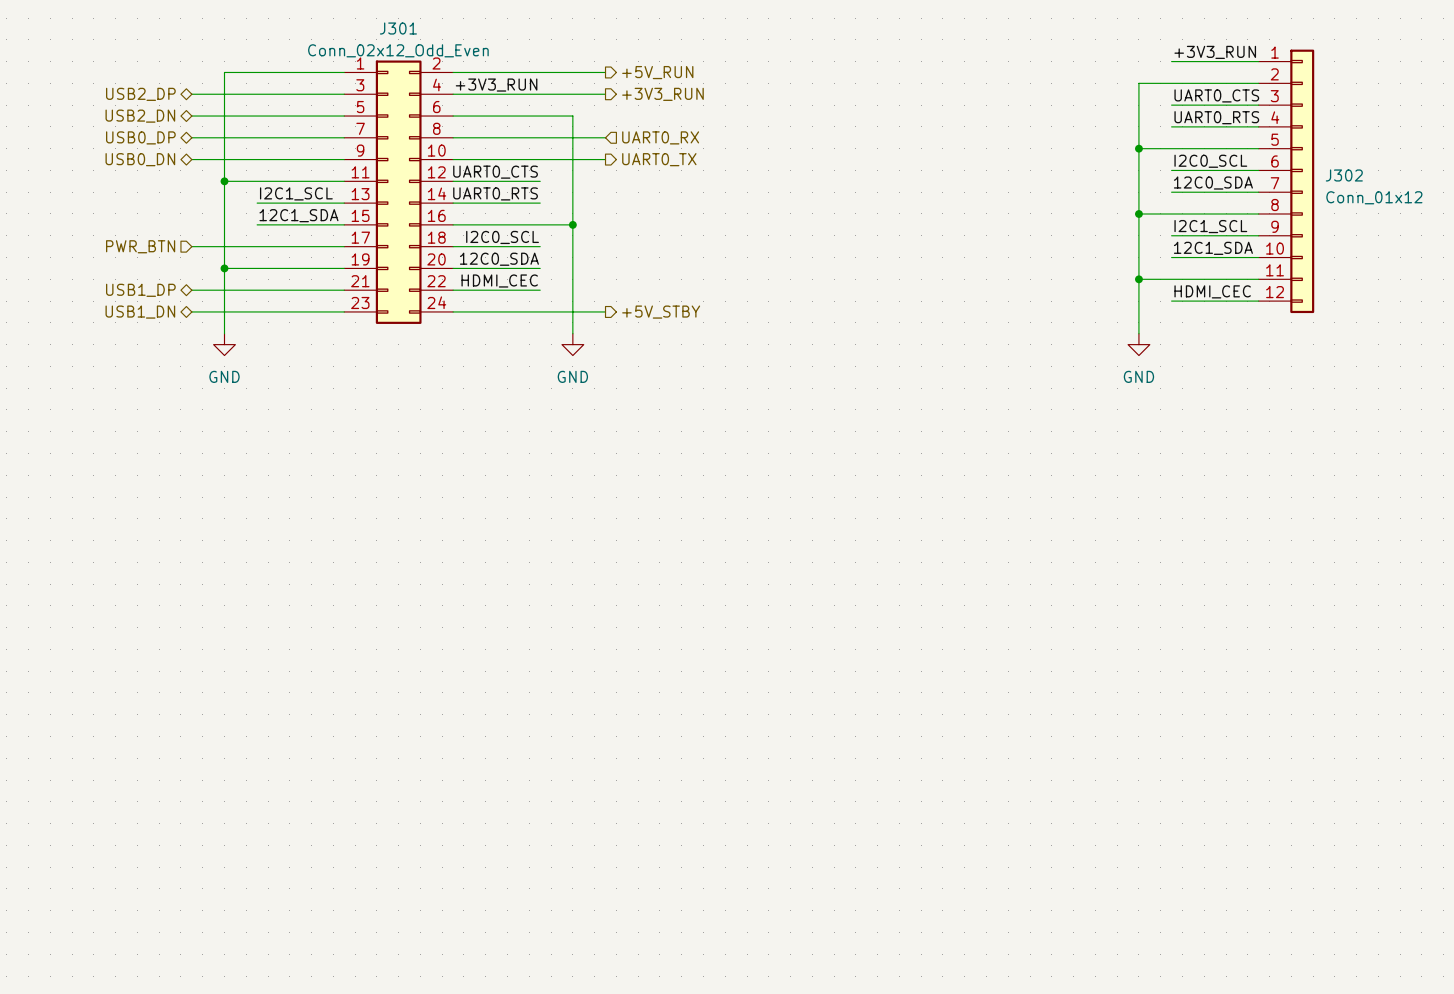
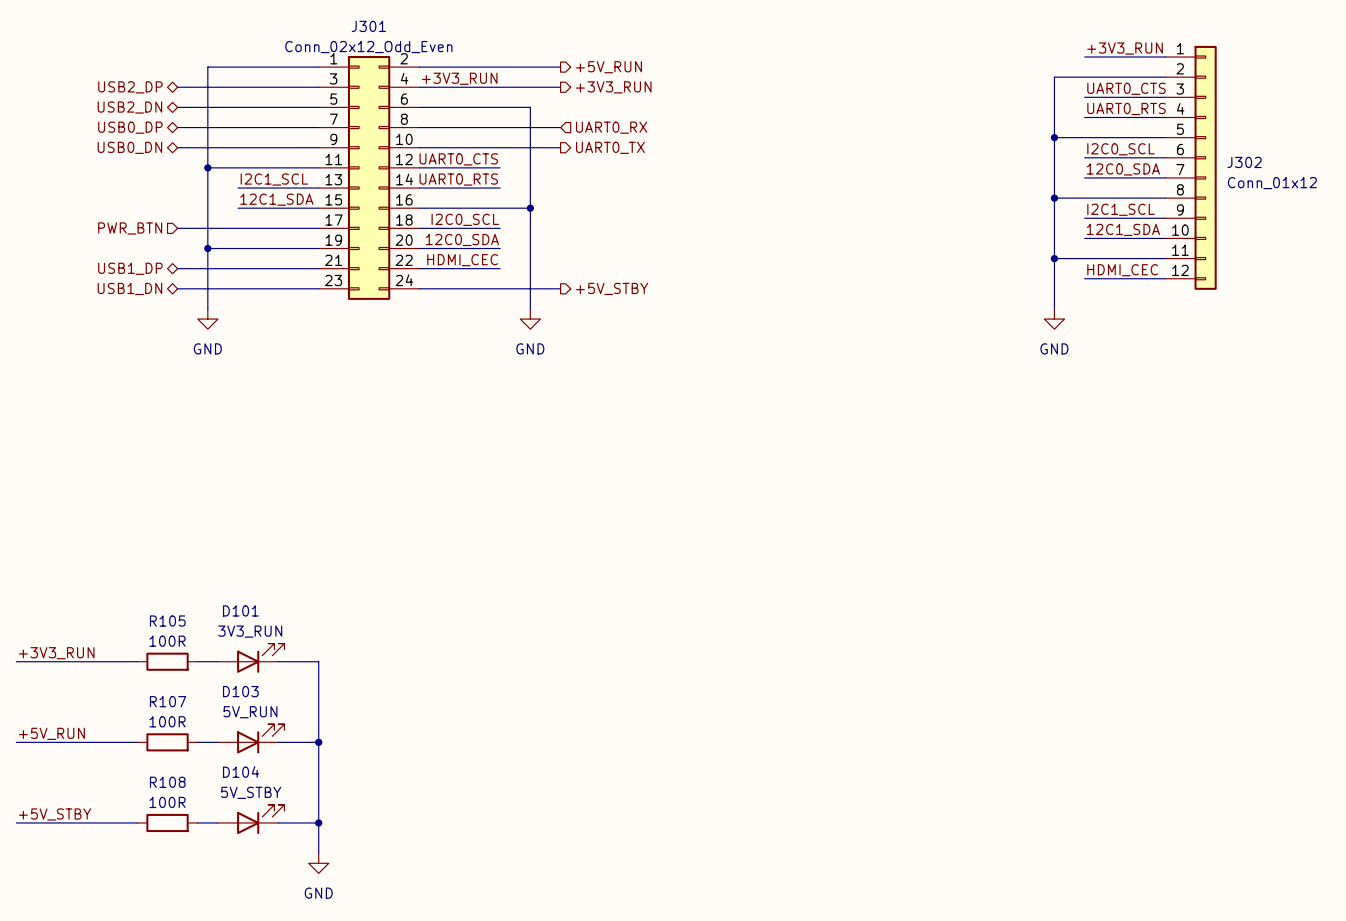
label: none -> +3V3_RUN (56, 653)
D101: none -> 3V3_RUN (251, 658)
wire: none -> (16, 661) (137, 661)
R105: none -> 100R (167, 661)
wire: none -> (197, 661) (217, 661)
wire: none -> (278, 661) (318, 661) (318, 853)
label: none -> +5V_RUN (51, 733)
D103: none -> 5V_RUN (251, 738)
wire: none -> (16, 742) (137, 742)
R107: none -> 100R (167, 742)
wire: none -> (197, 742) (217, 742)
wire: none -> (278, 742) (318, 742)
junction: none -> (318, 742)
label: none -> +5V_STBY (55, 814)
D104: none -> 5V_STBY (251, 819)
wire: none -> (16, 822) (137, 822)
R108: none -> 100R (167, 822)
wire: none -> (197, 822) (217, 822)
wire: none -> (278, 822) (318, 822)
junction: none -> (318, 822)
power symbol: none -> GND (318, 863)

